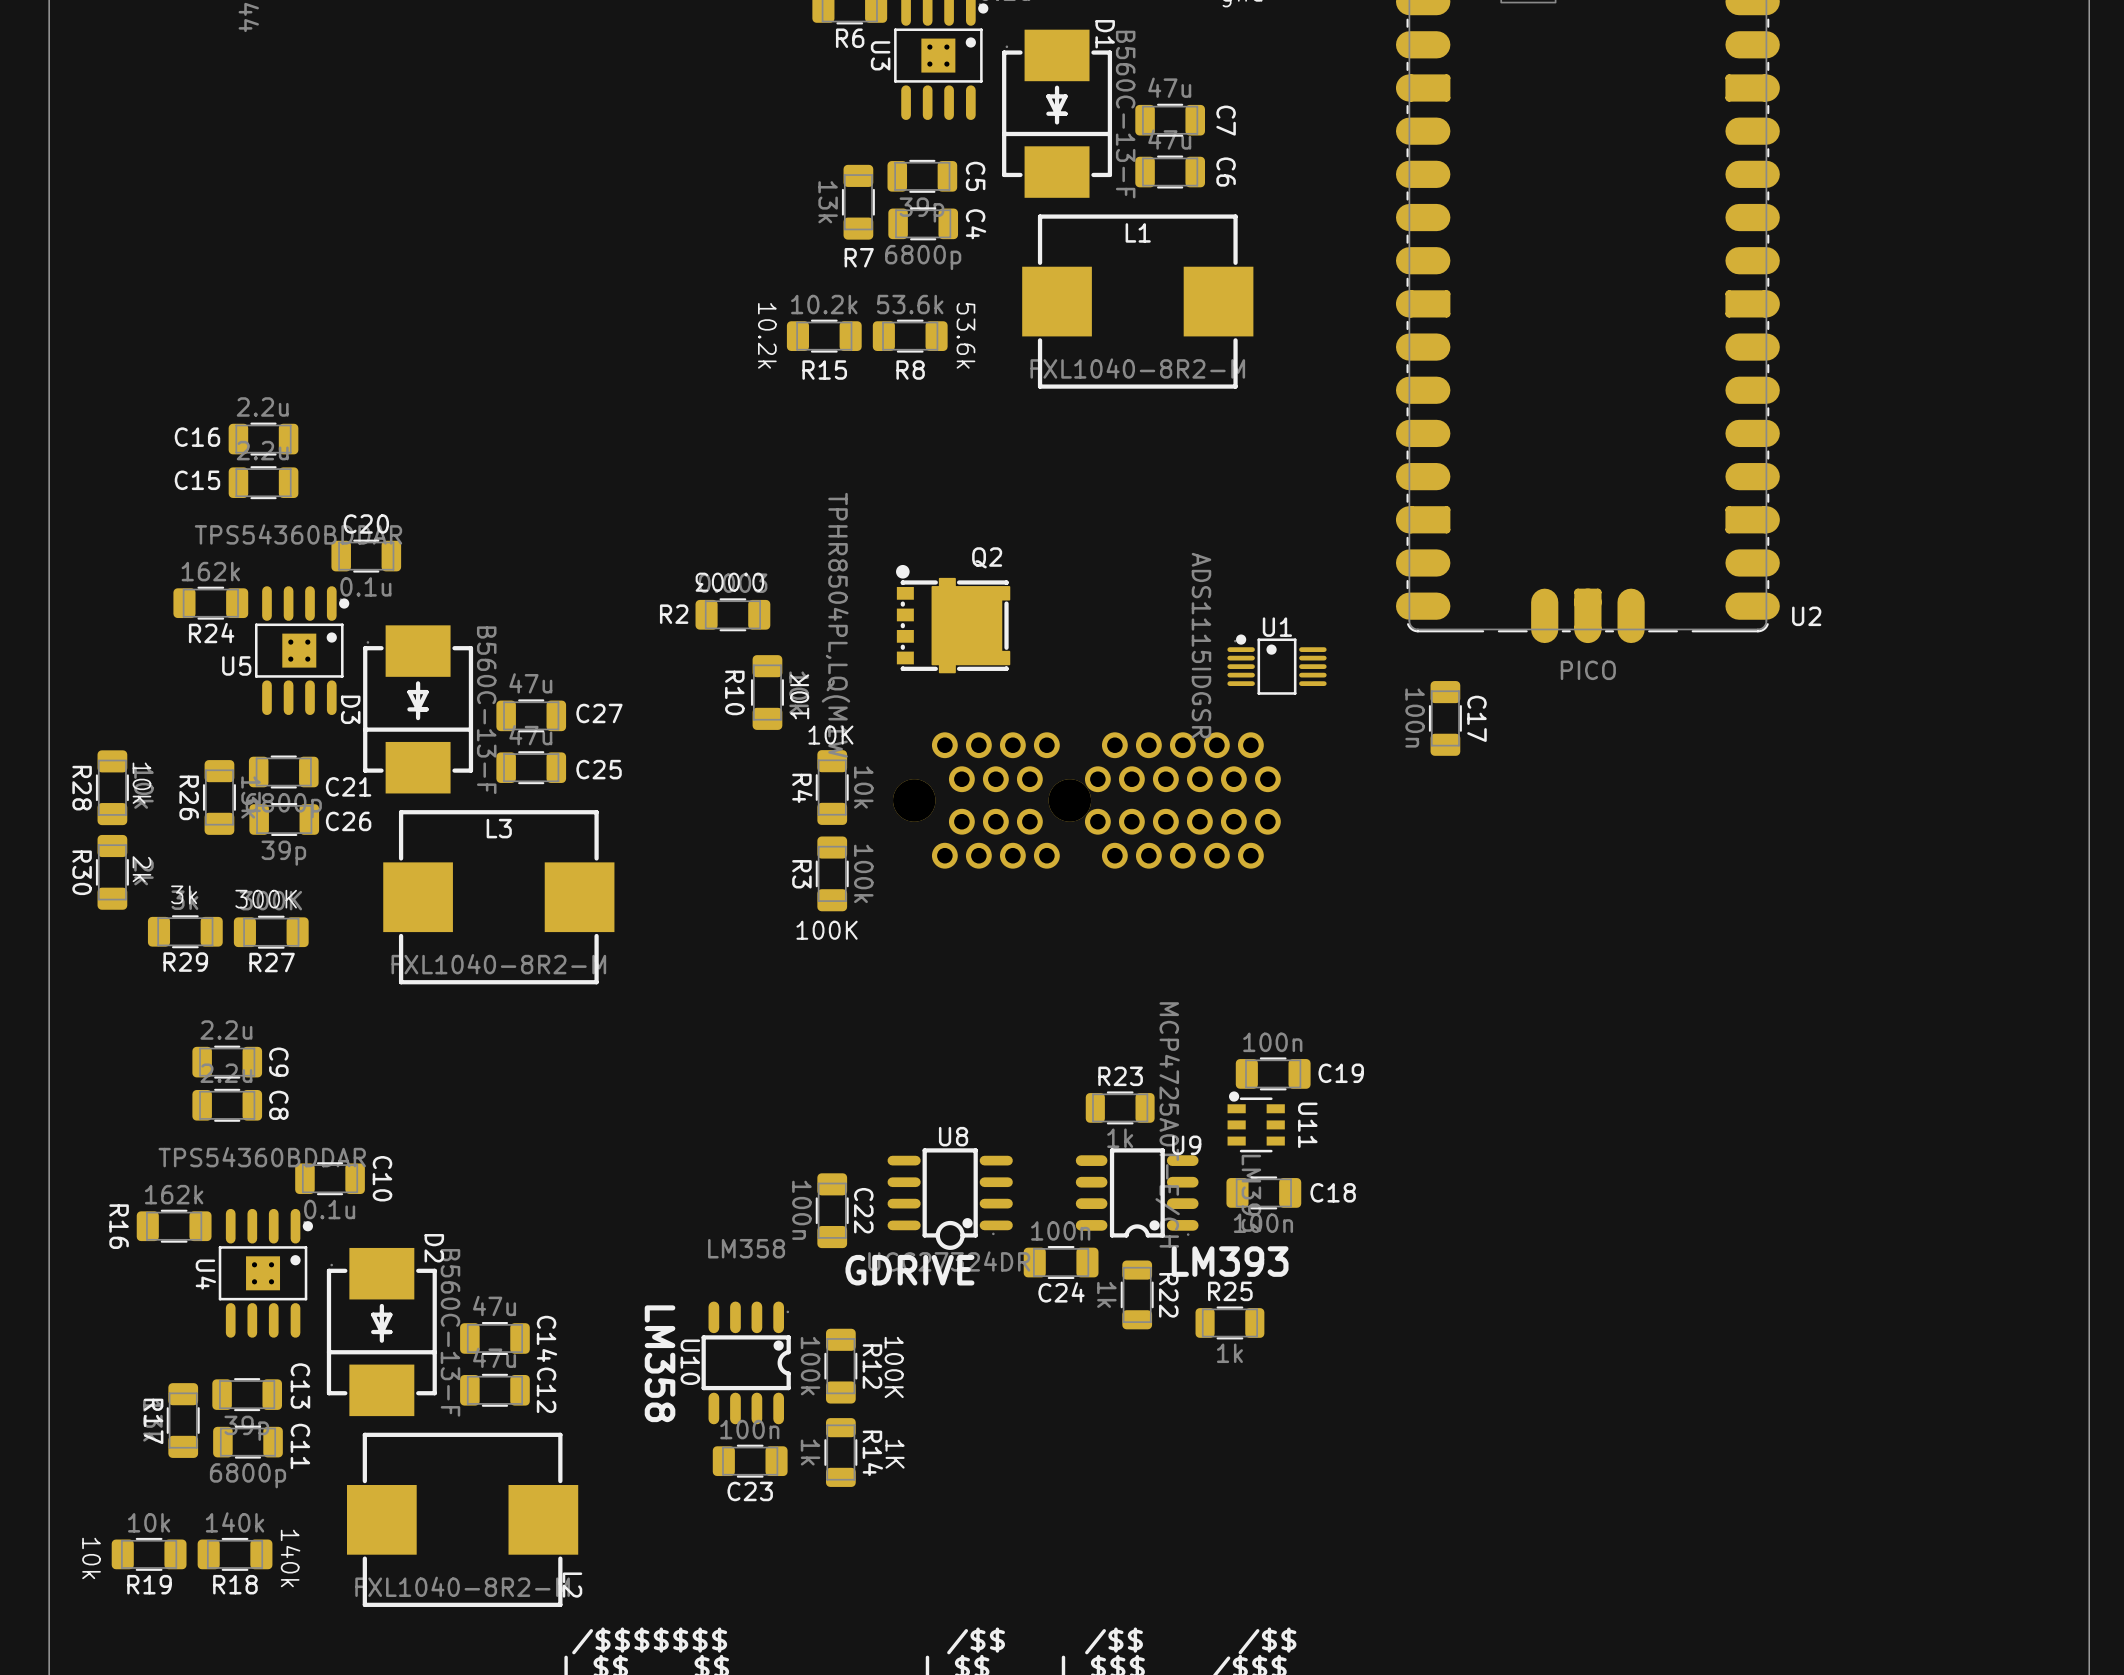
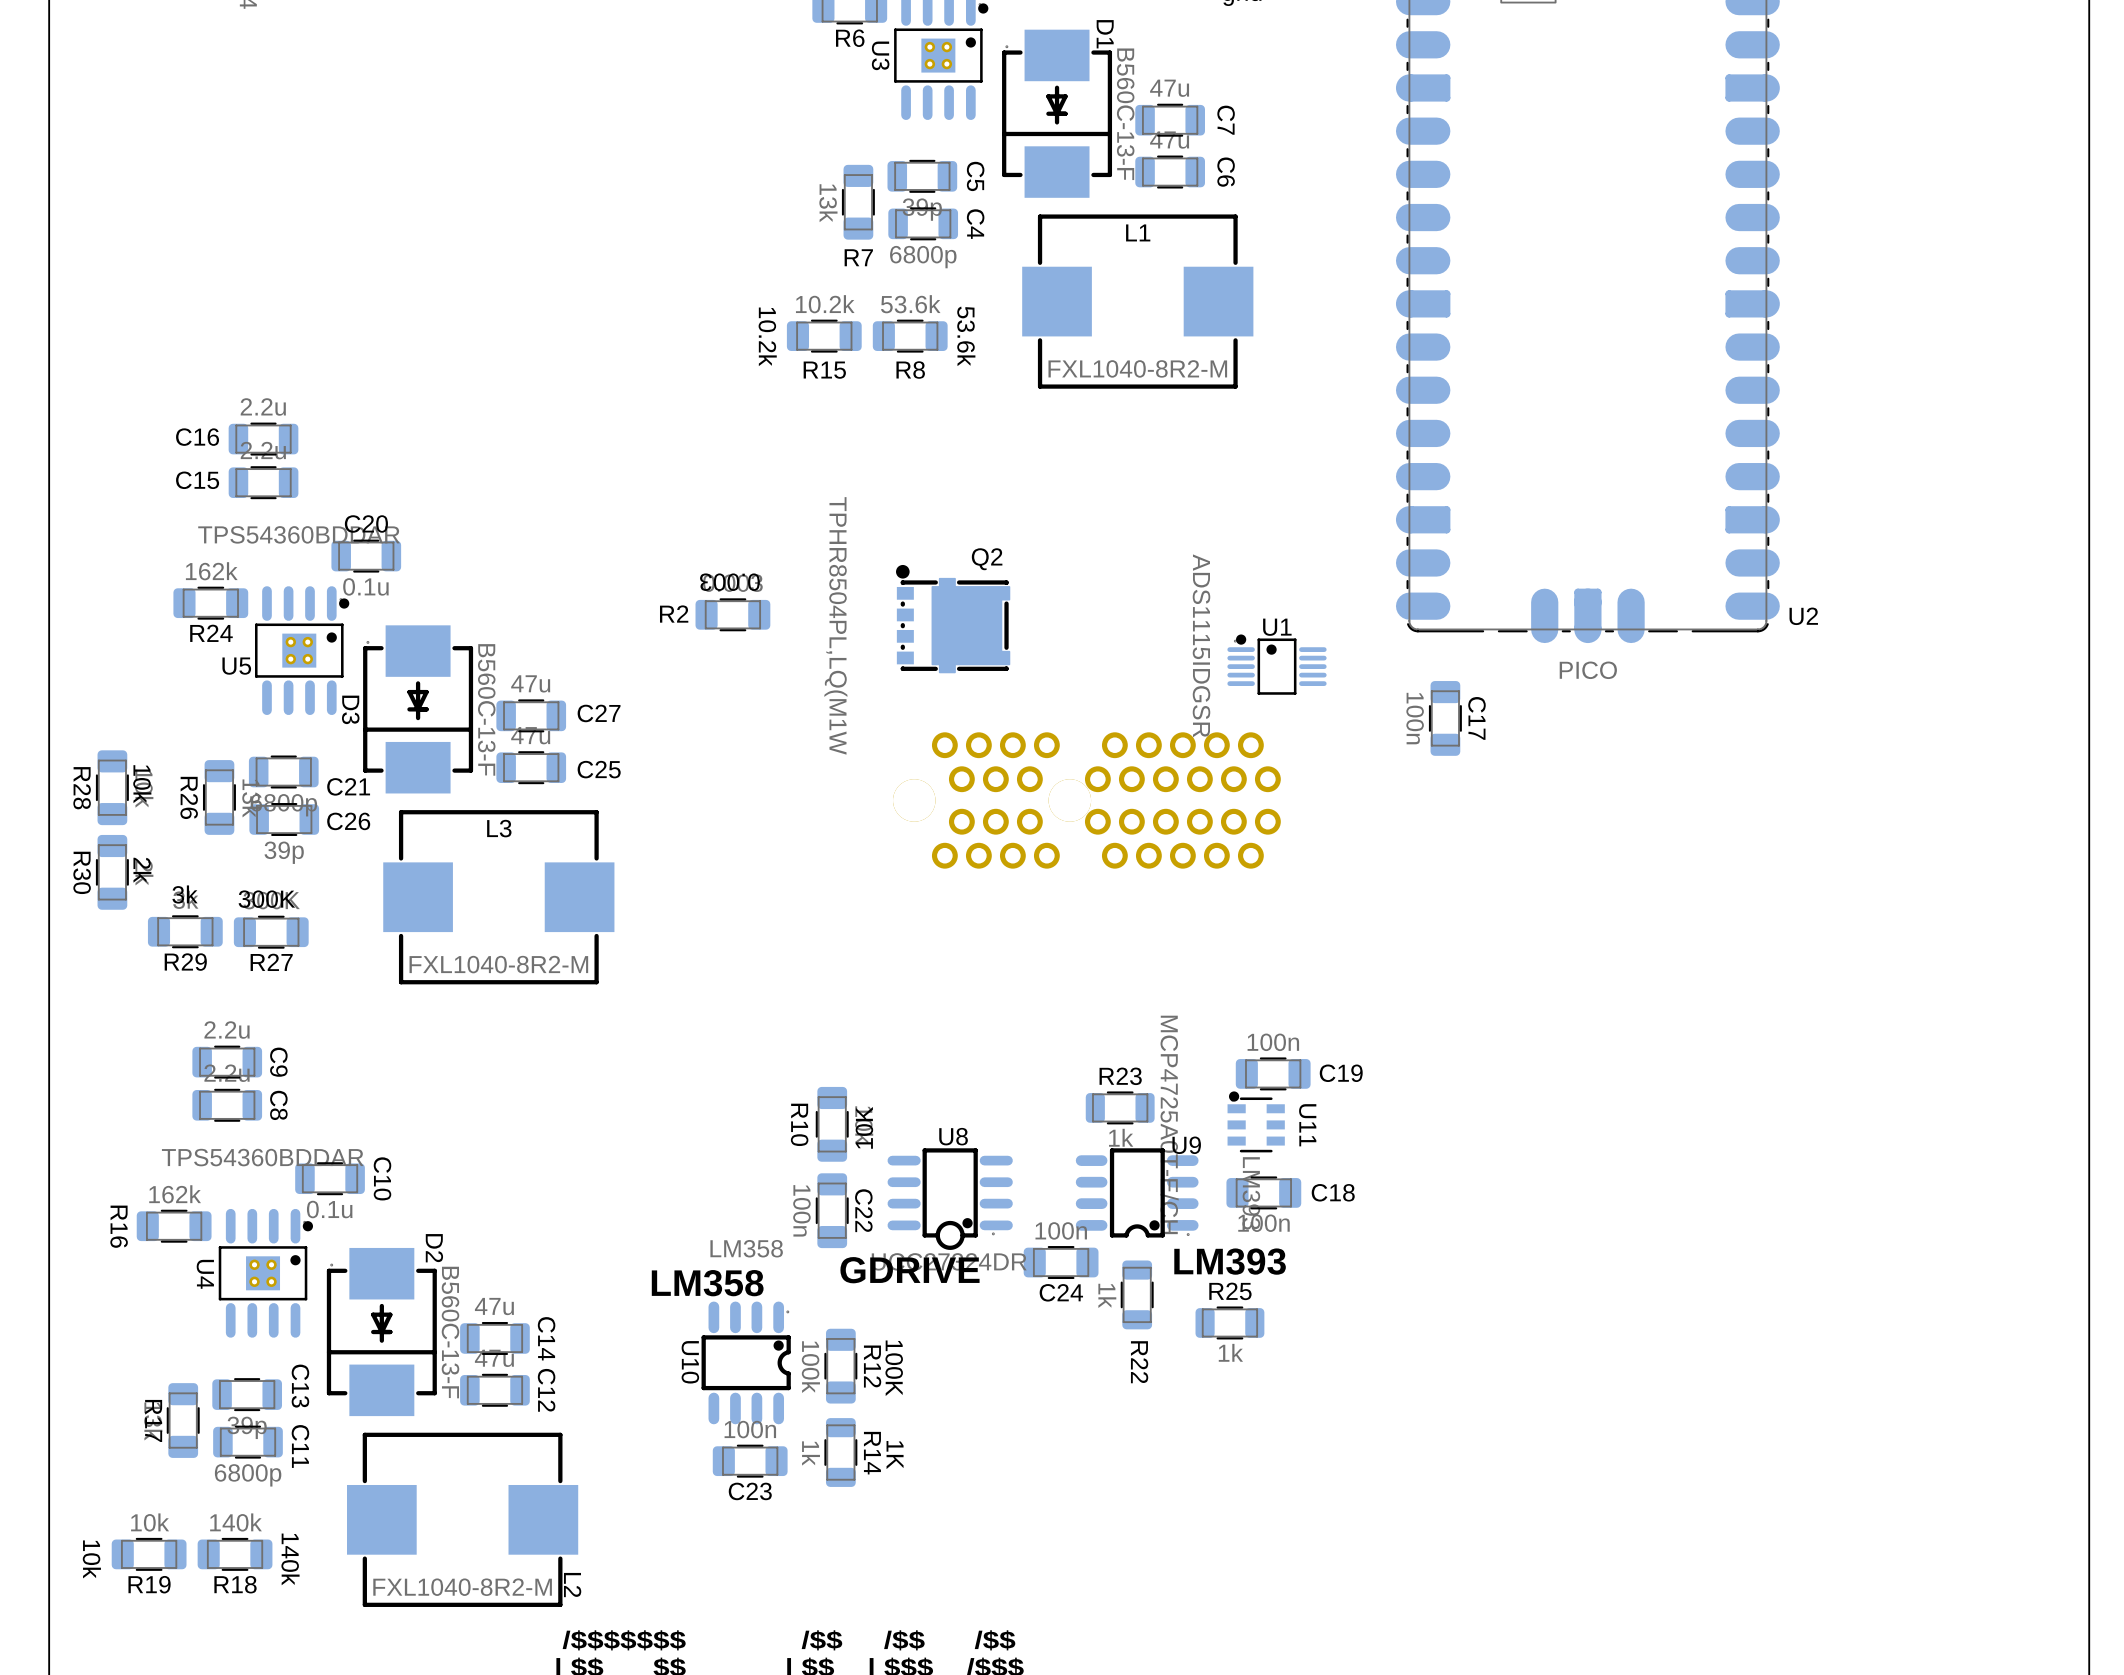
R10 position: (767, 692) -> (832, 1124)
text: 10K (799, 696) -> none
text: 10K (830, 735) -> none
R4: 10k (832, 787) -> none
R3: 100k (832, 873) -> none
text: 100K (827, 930) -> none
text: none -> 10K (864, 1127)
R22 name position: R22 (1168, 1295) -> R22 (1139, 1362)
text rotation: 0° (660, 1363) -> 90° counterclockwise (707, 1283)

